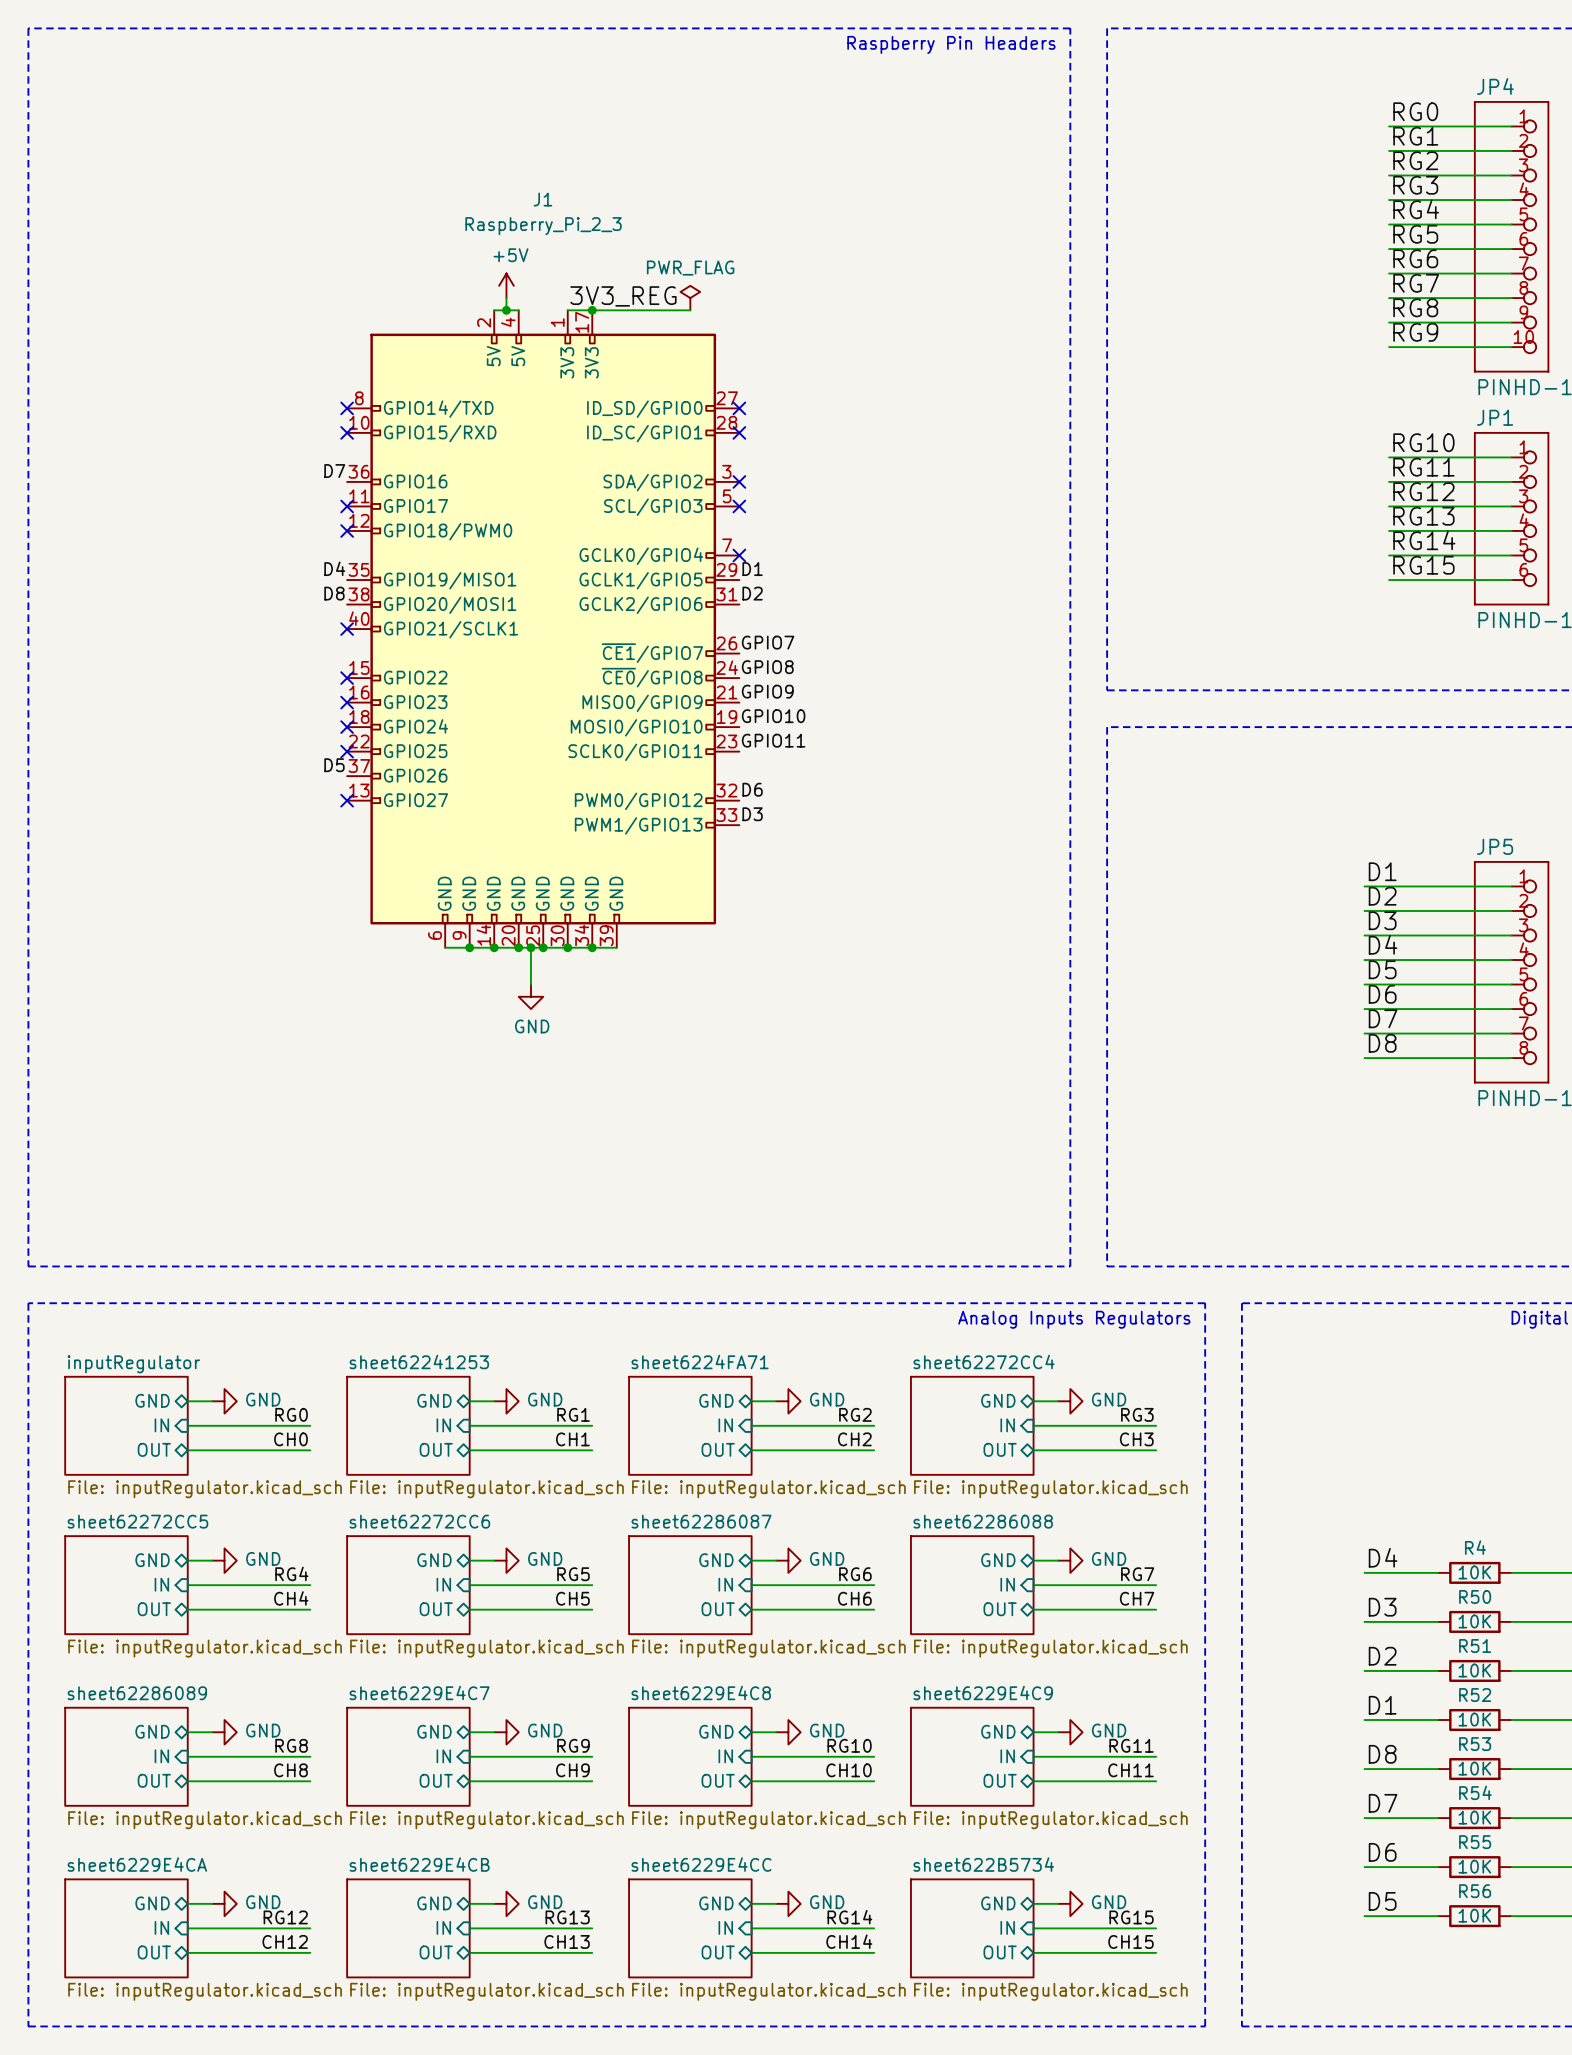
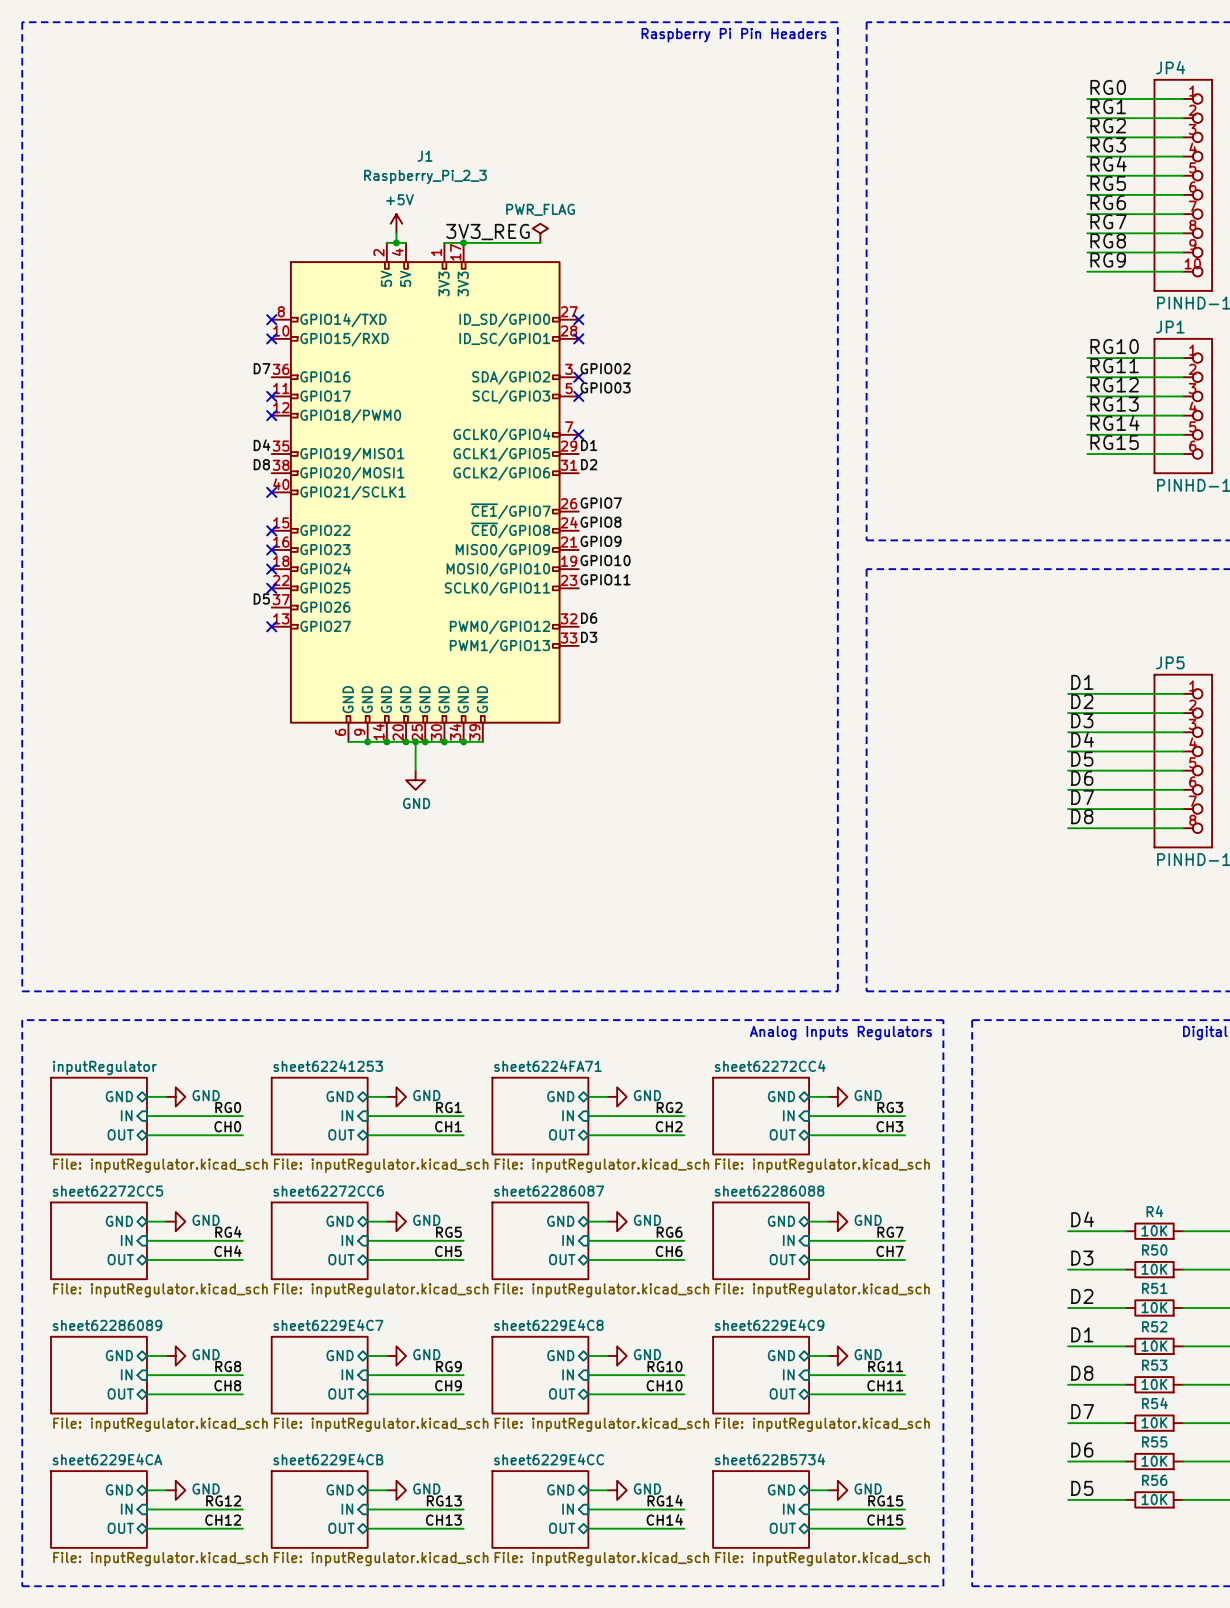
text: Raspberry Pin Headers (951, 44) -> Raspberry Pi Pin Headers (734, 35)
label: none -> GPIO02 (605, 368)
label: none -> GPIO03 (605, 387)

